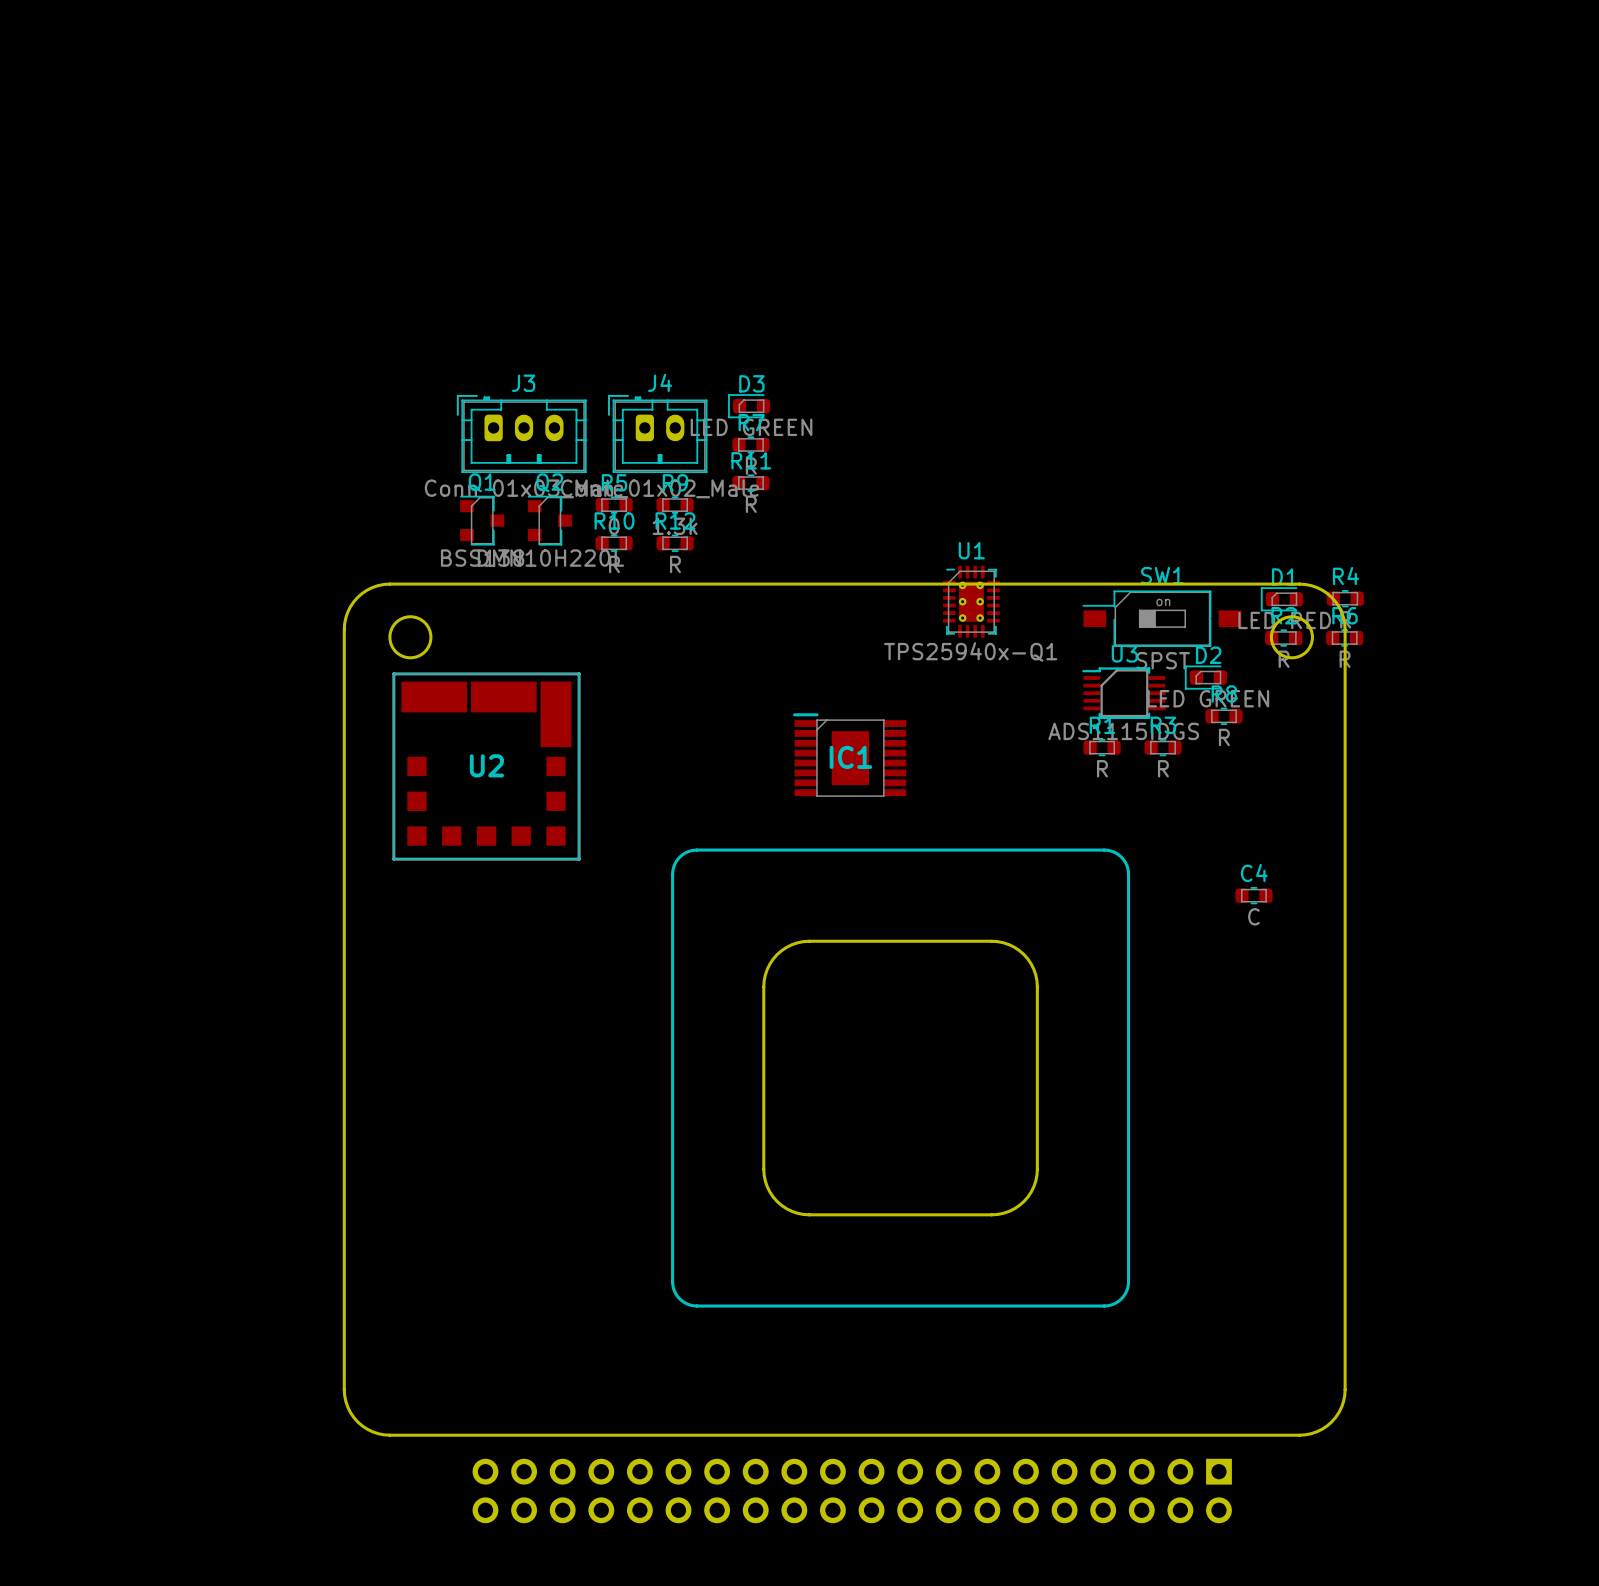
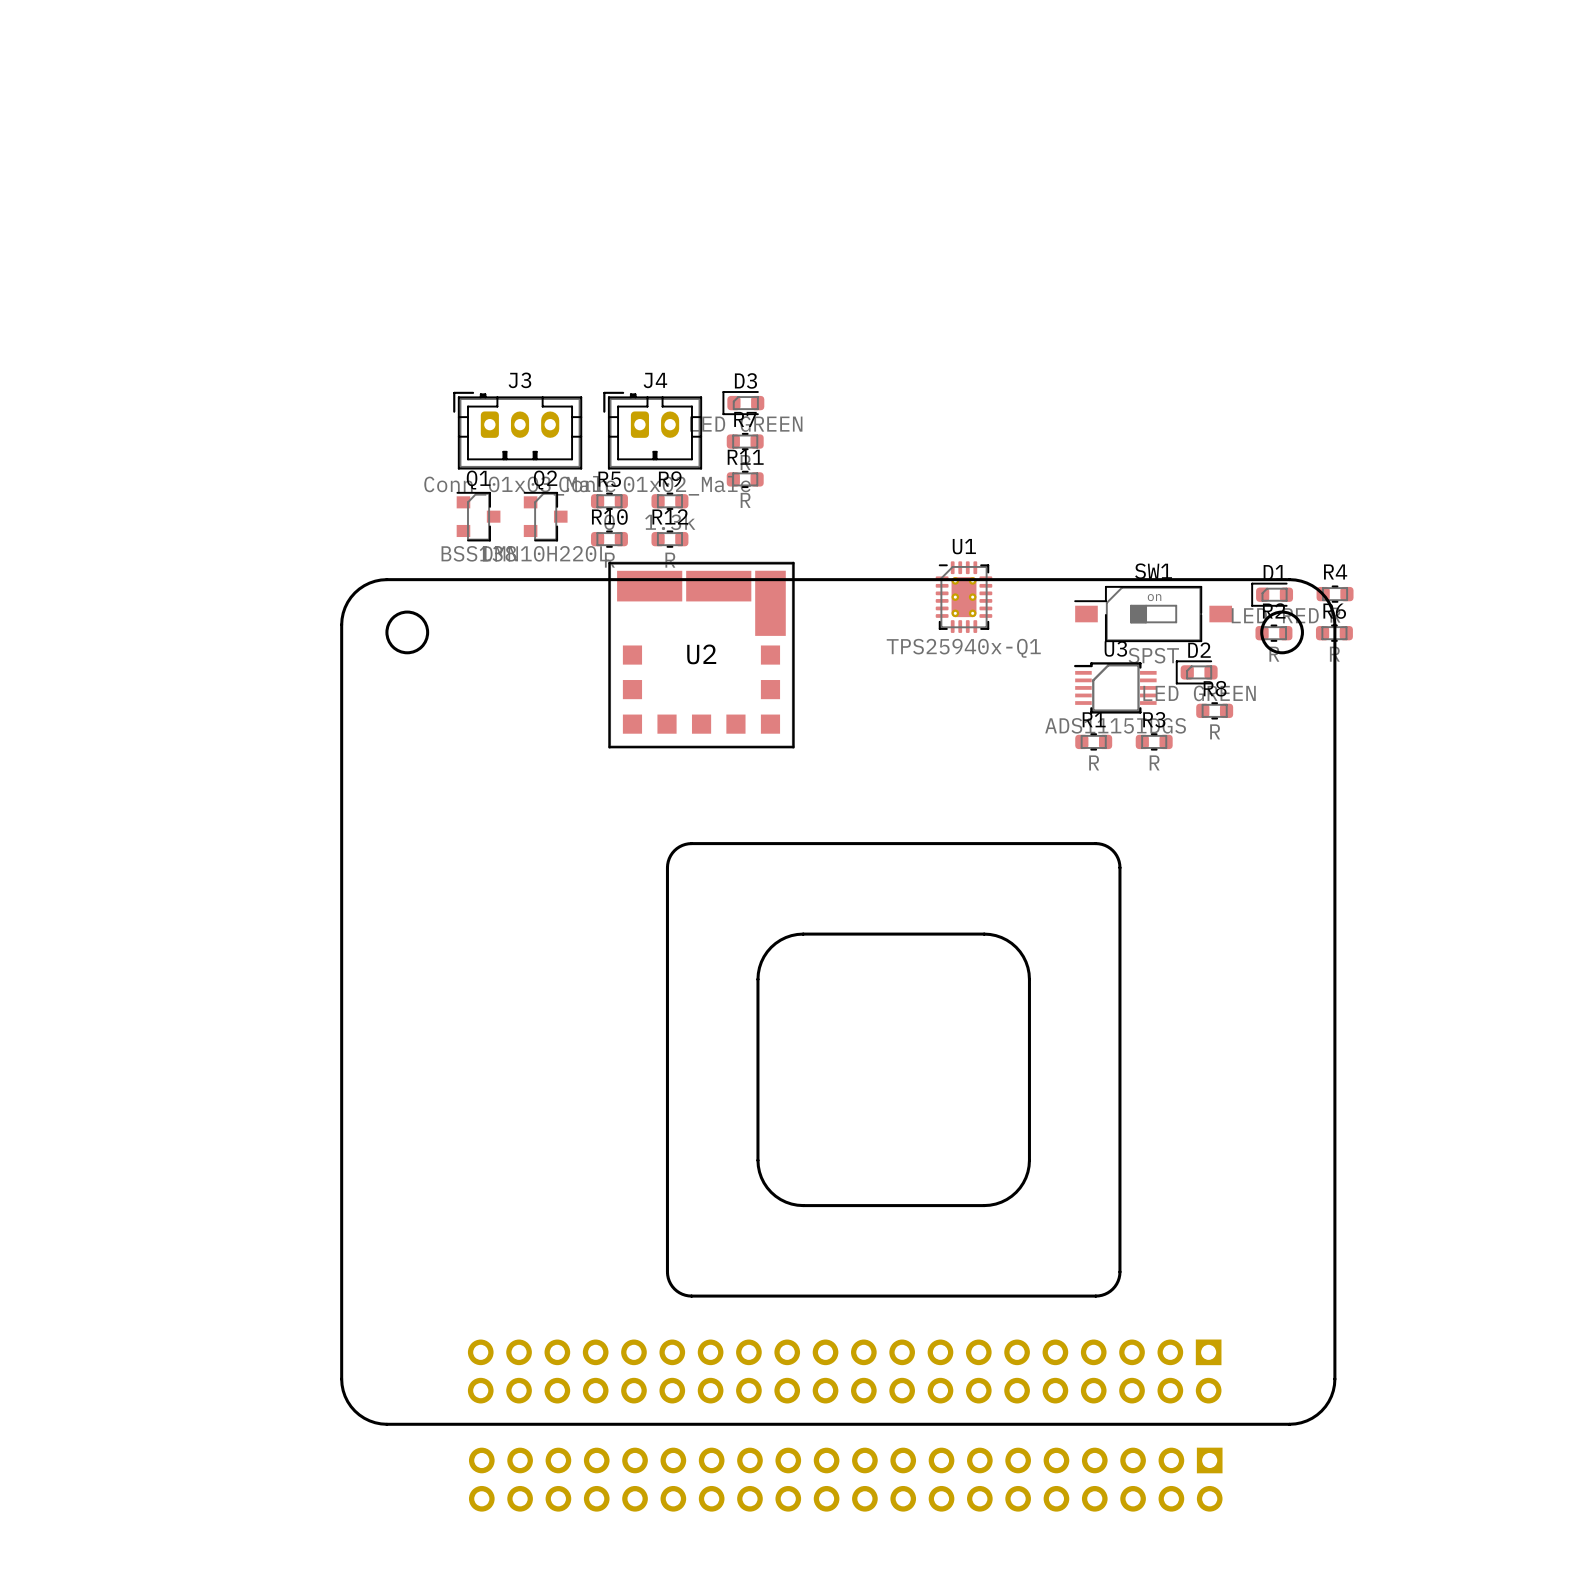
IC1: (849, 755) -> none
U2 position: (486, 766) -> (701, 655)
C4: C (1253, 895) -> none
part: none -> (844, 1371)

